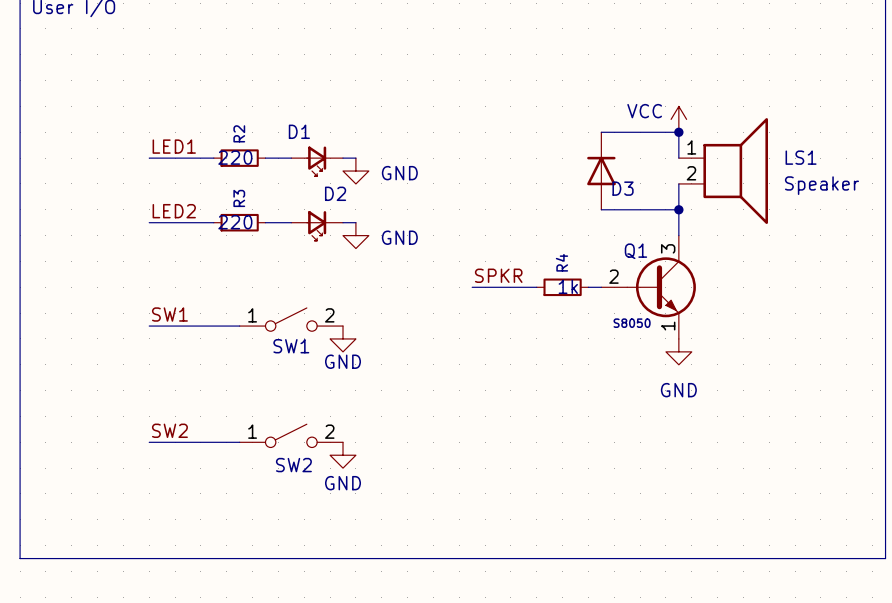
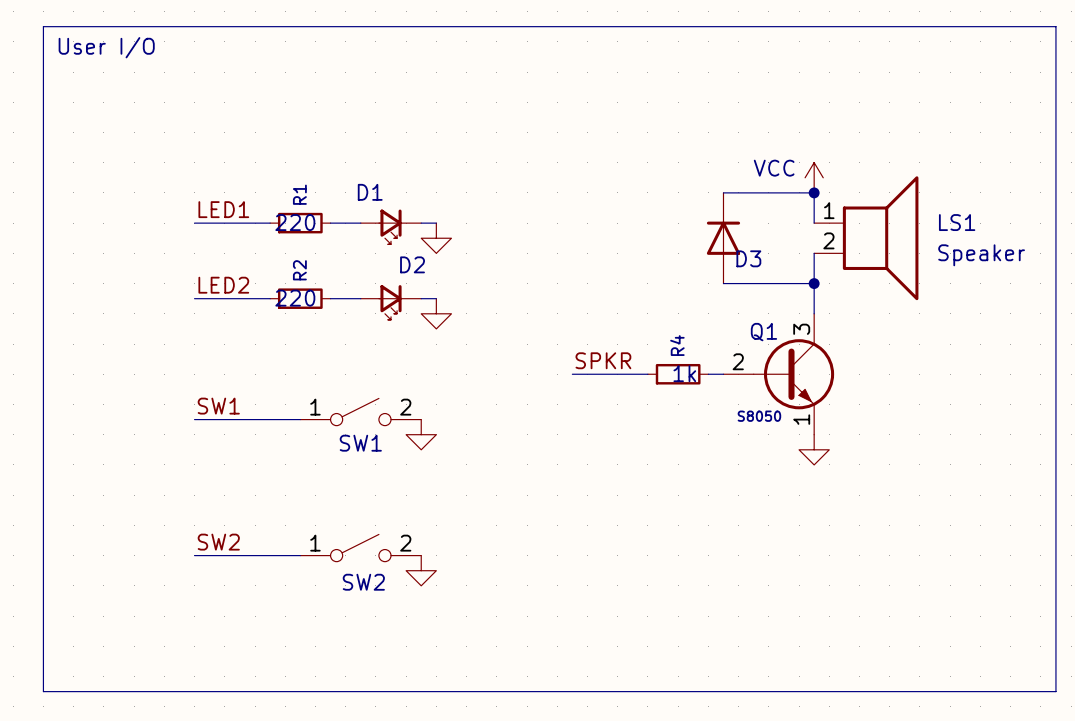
R2 name: R2 (239, 133) -> R1 (299, 194)
power symbol text: GND (399, 173) -> none
R3 name: R3 (239, 198) -> R2 (299, 270)
power symbol text: GND (399, 237) -> none
power symbol text: GND (343, 361) -> none
power symbol text: GND (678, 390) -> none
power symbol text: GND (343, 483) -> none

